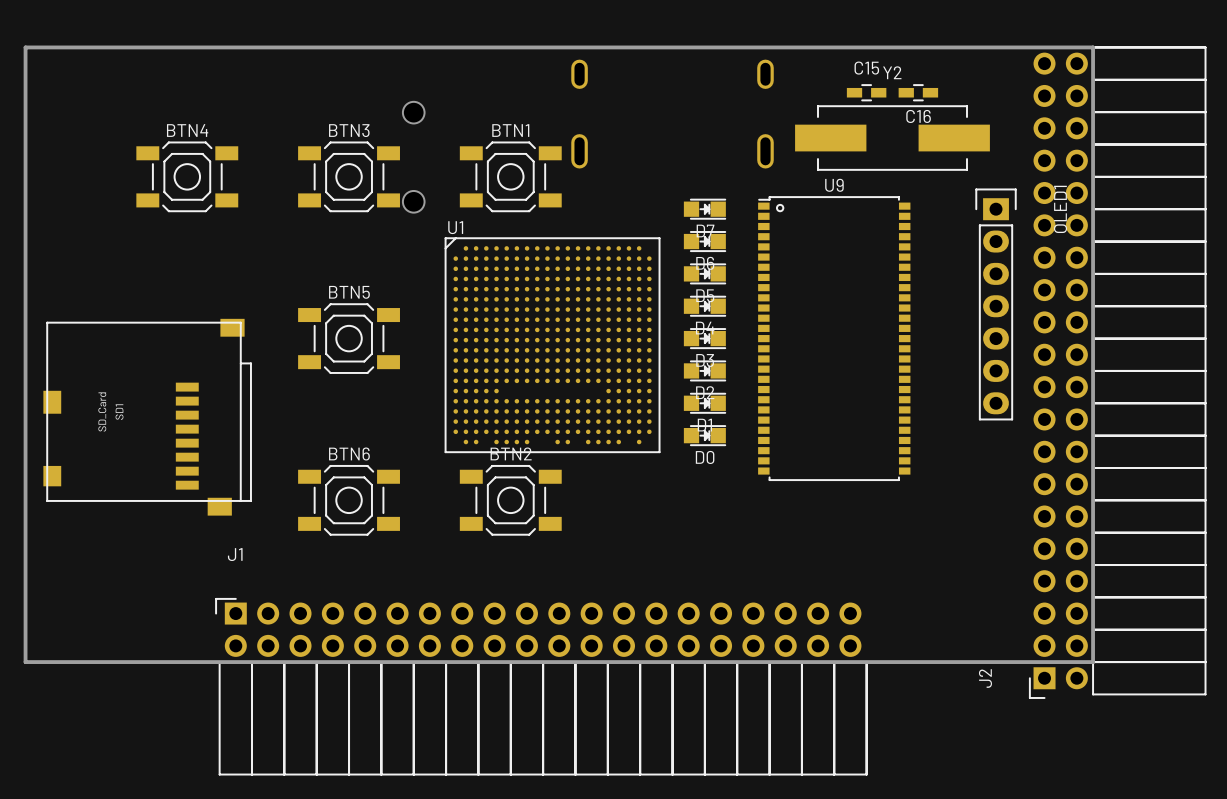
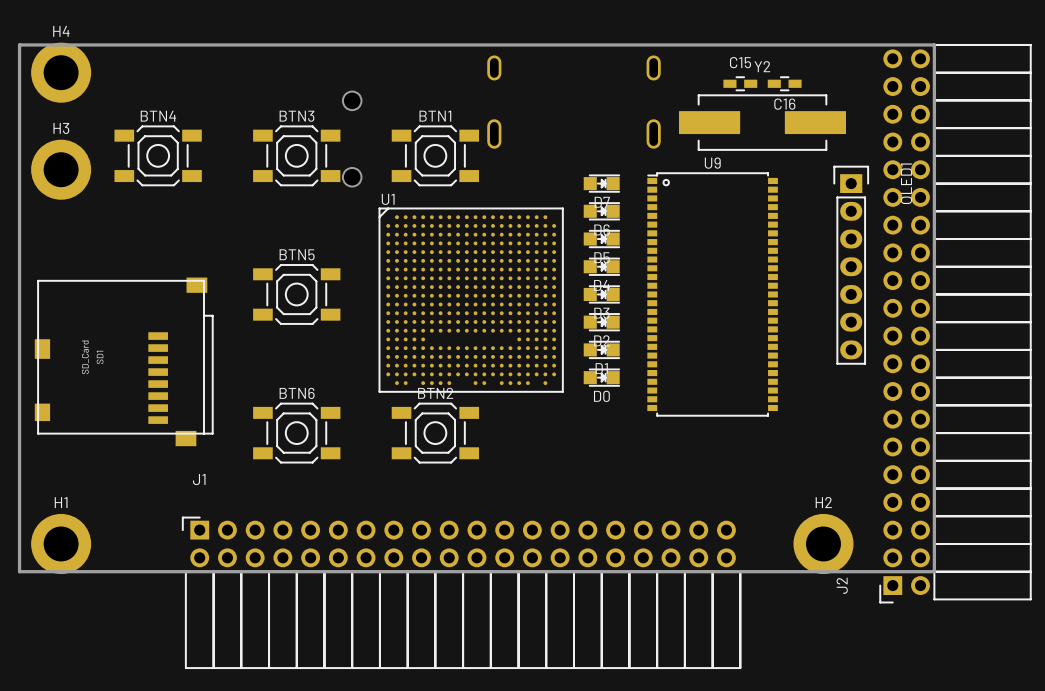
H4: none -> (61, 72)
H3: none -> (61, 169)
H1: none -> (61, 543)
H2: none -> (823, 543)

